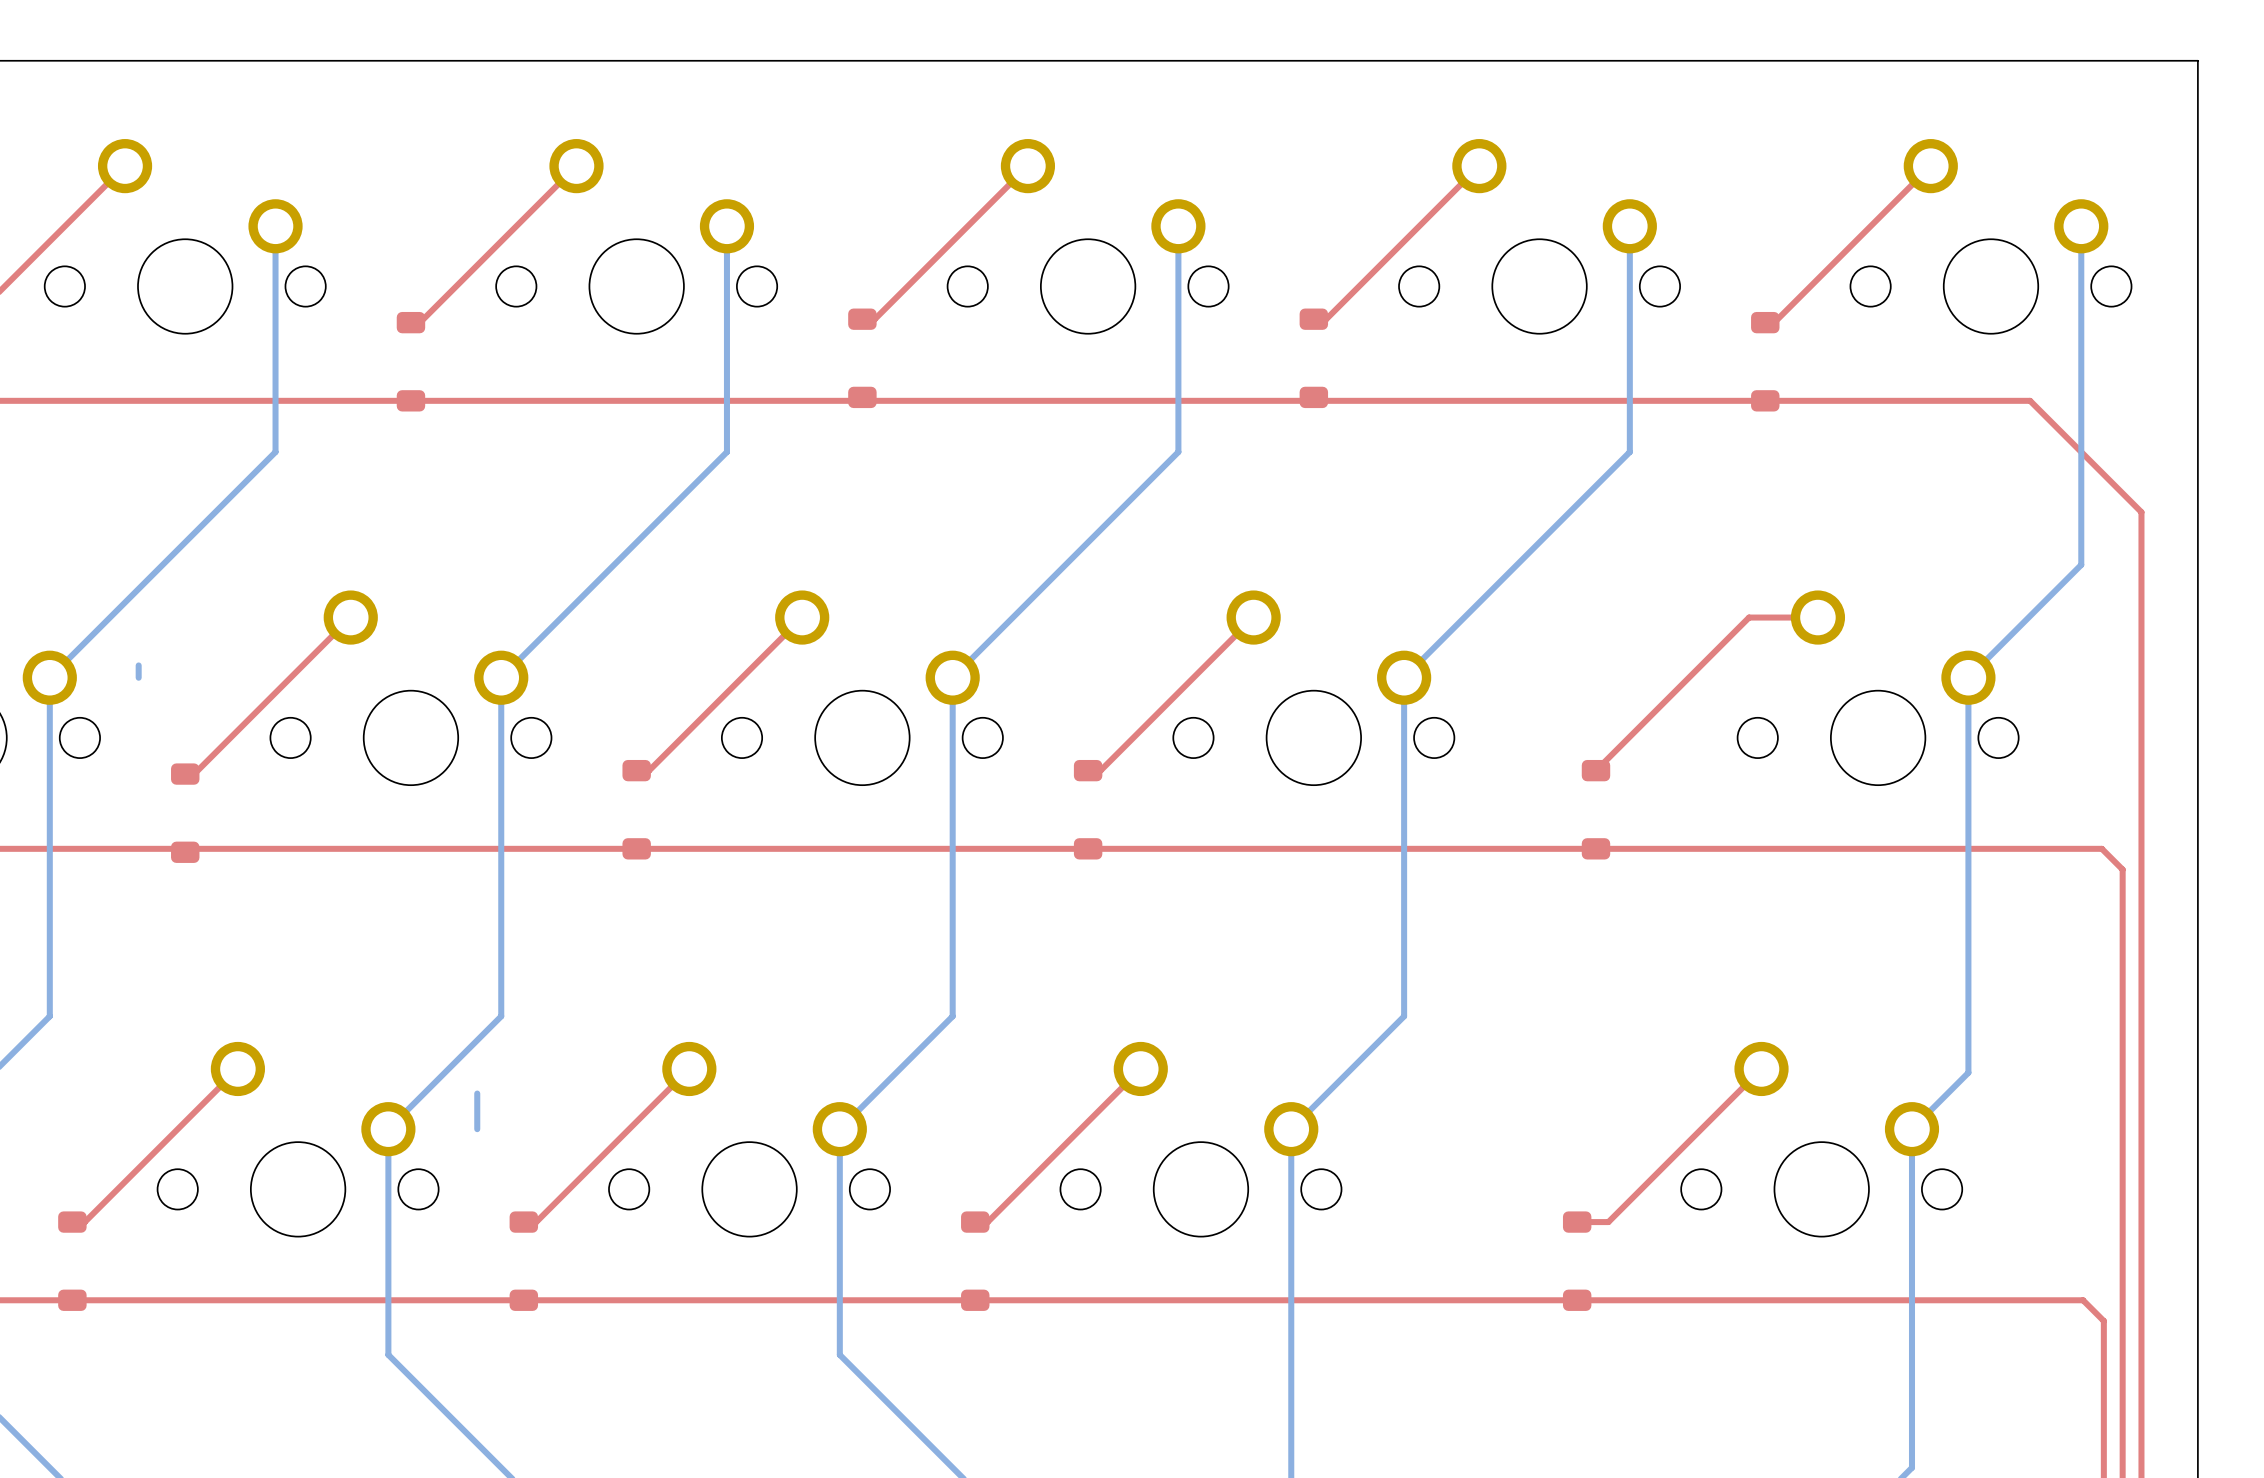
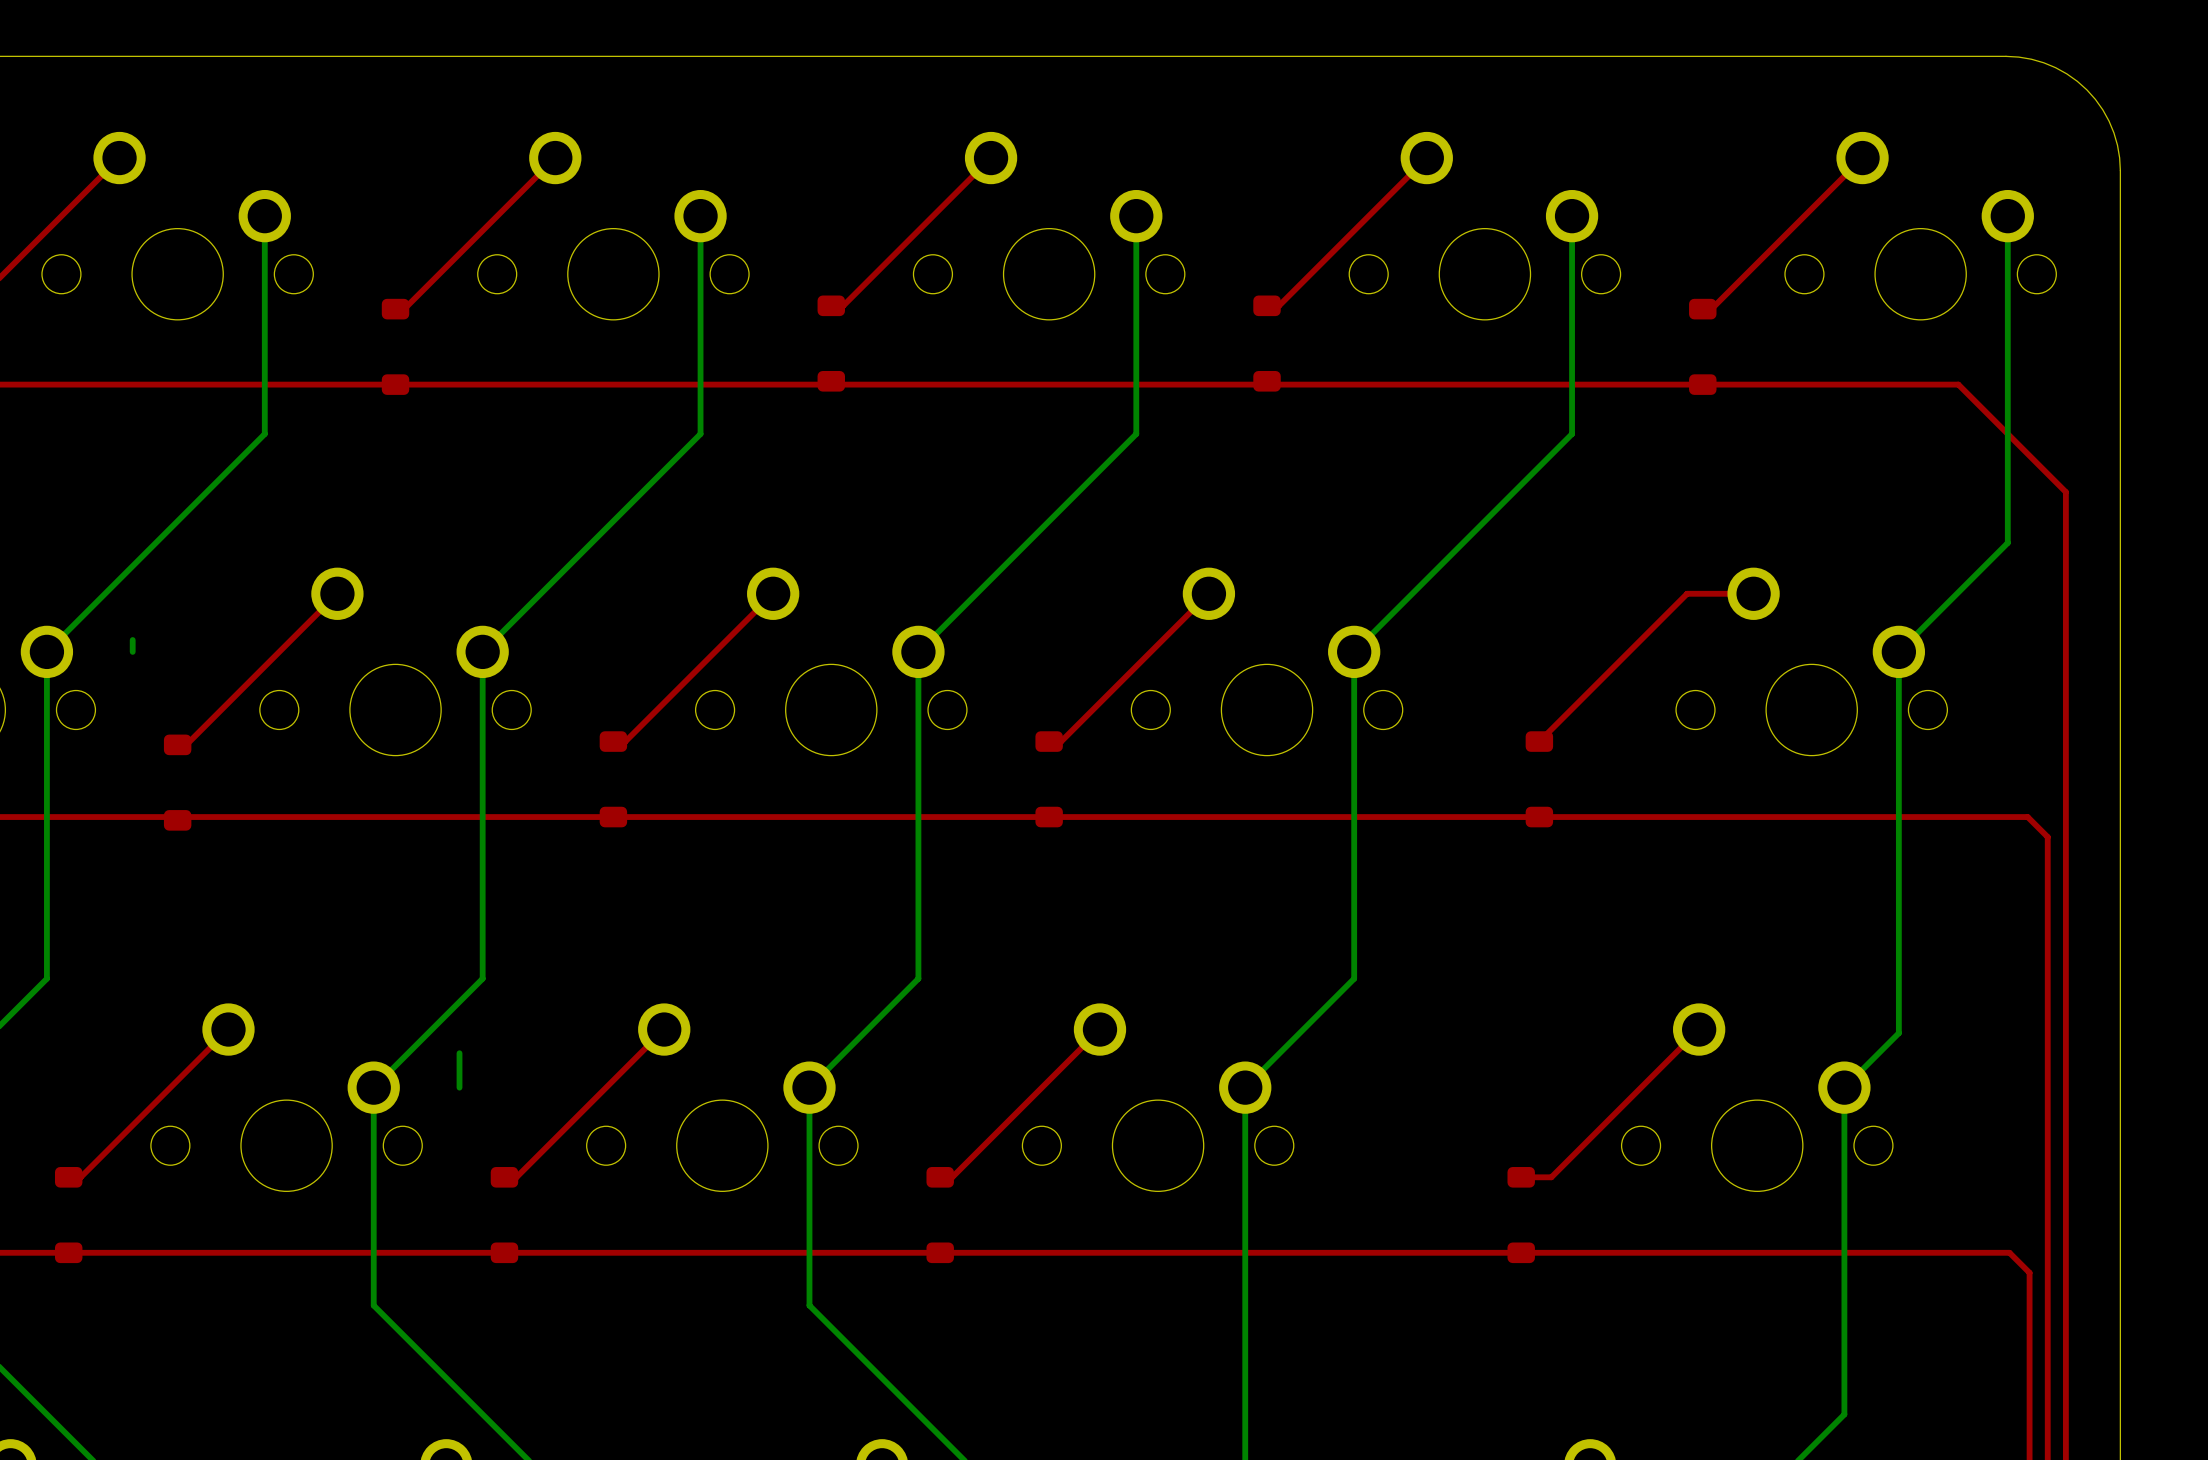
board edge: (2079, 60) (2197, 60) (2197, 179) -> (2006, 56) (2031, 59) (2055, 67) (2086, 89) (2102, 109) (2113, 132) (2120, 170)

